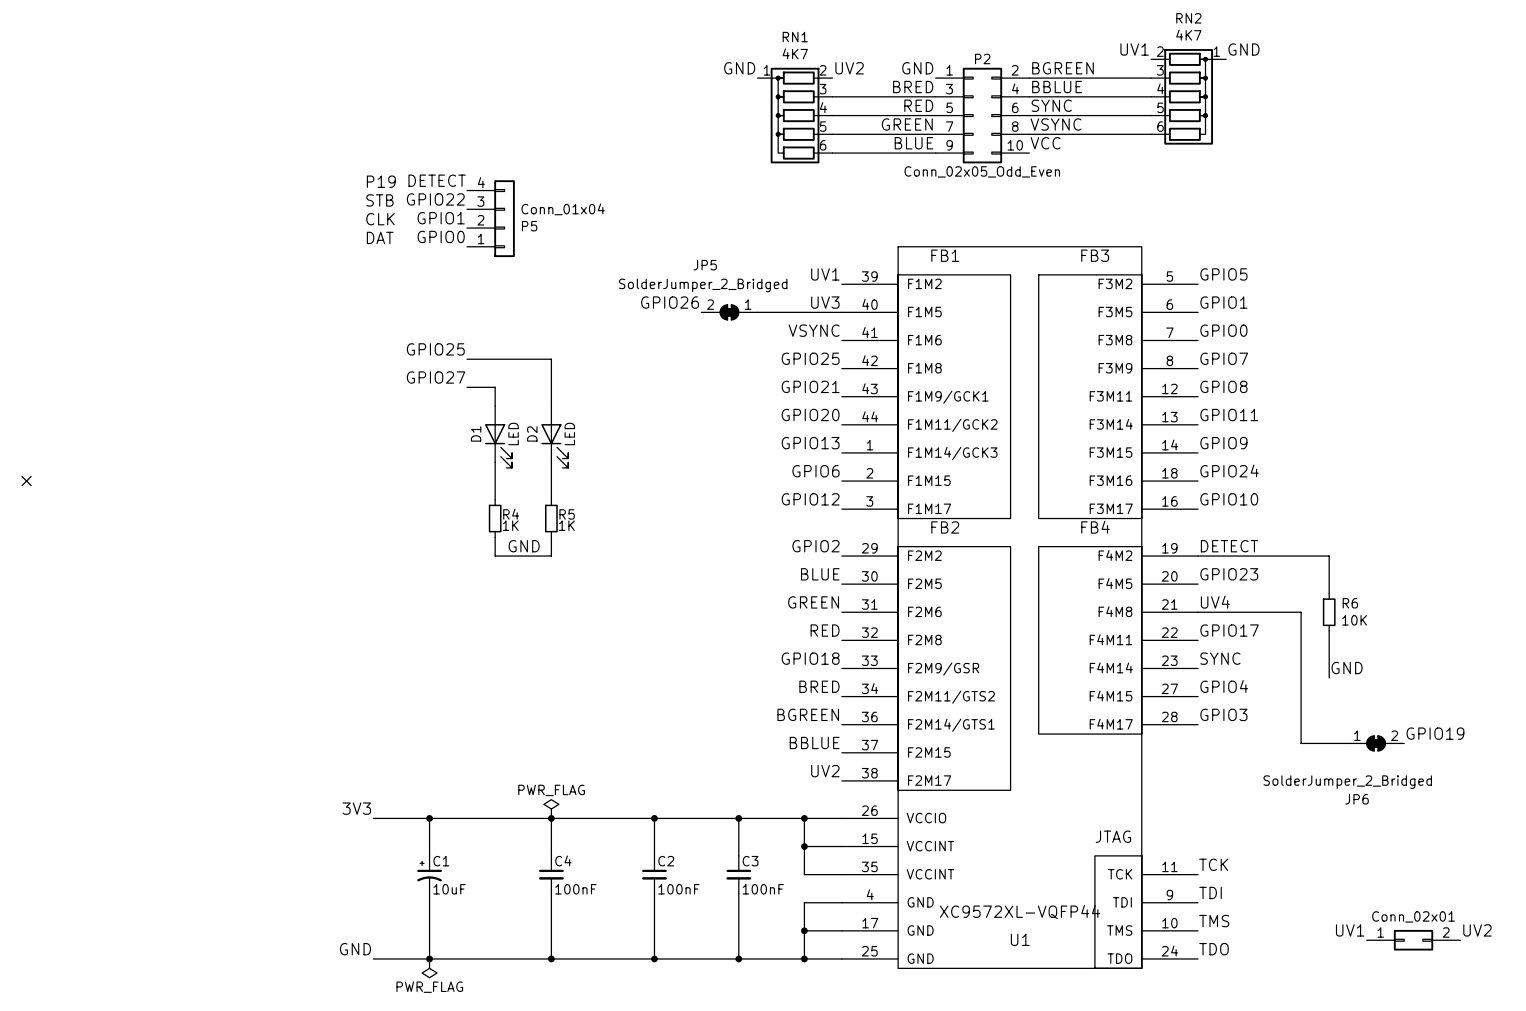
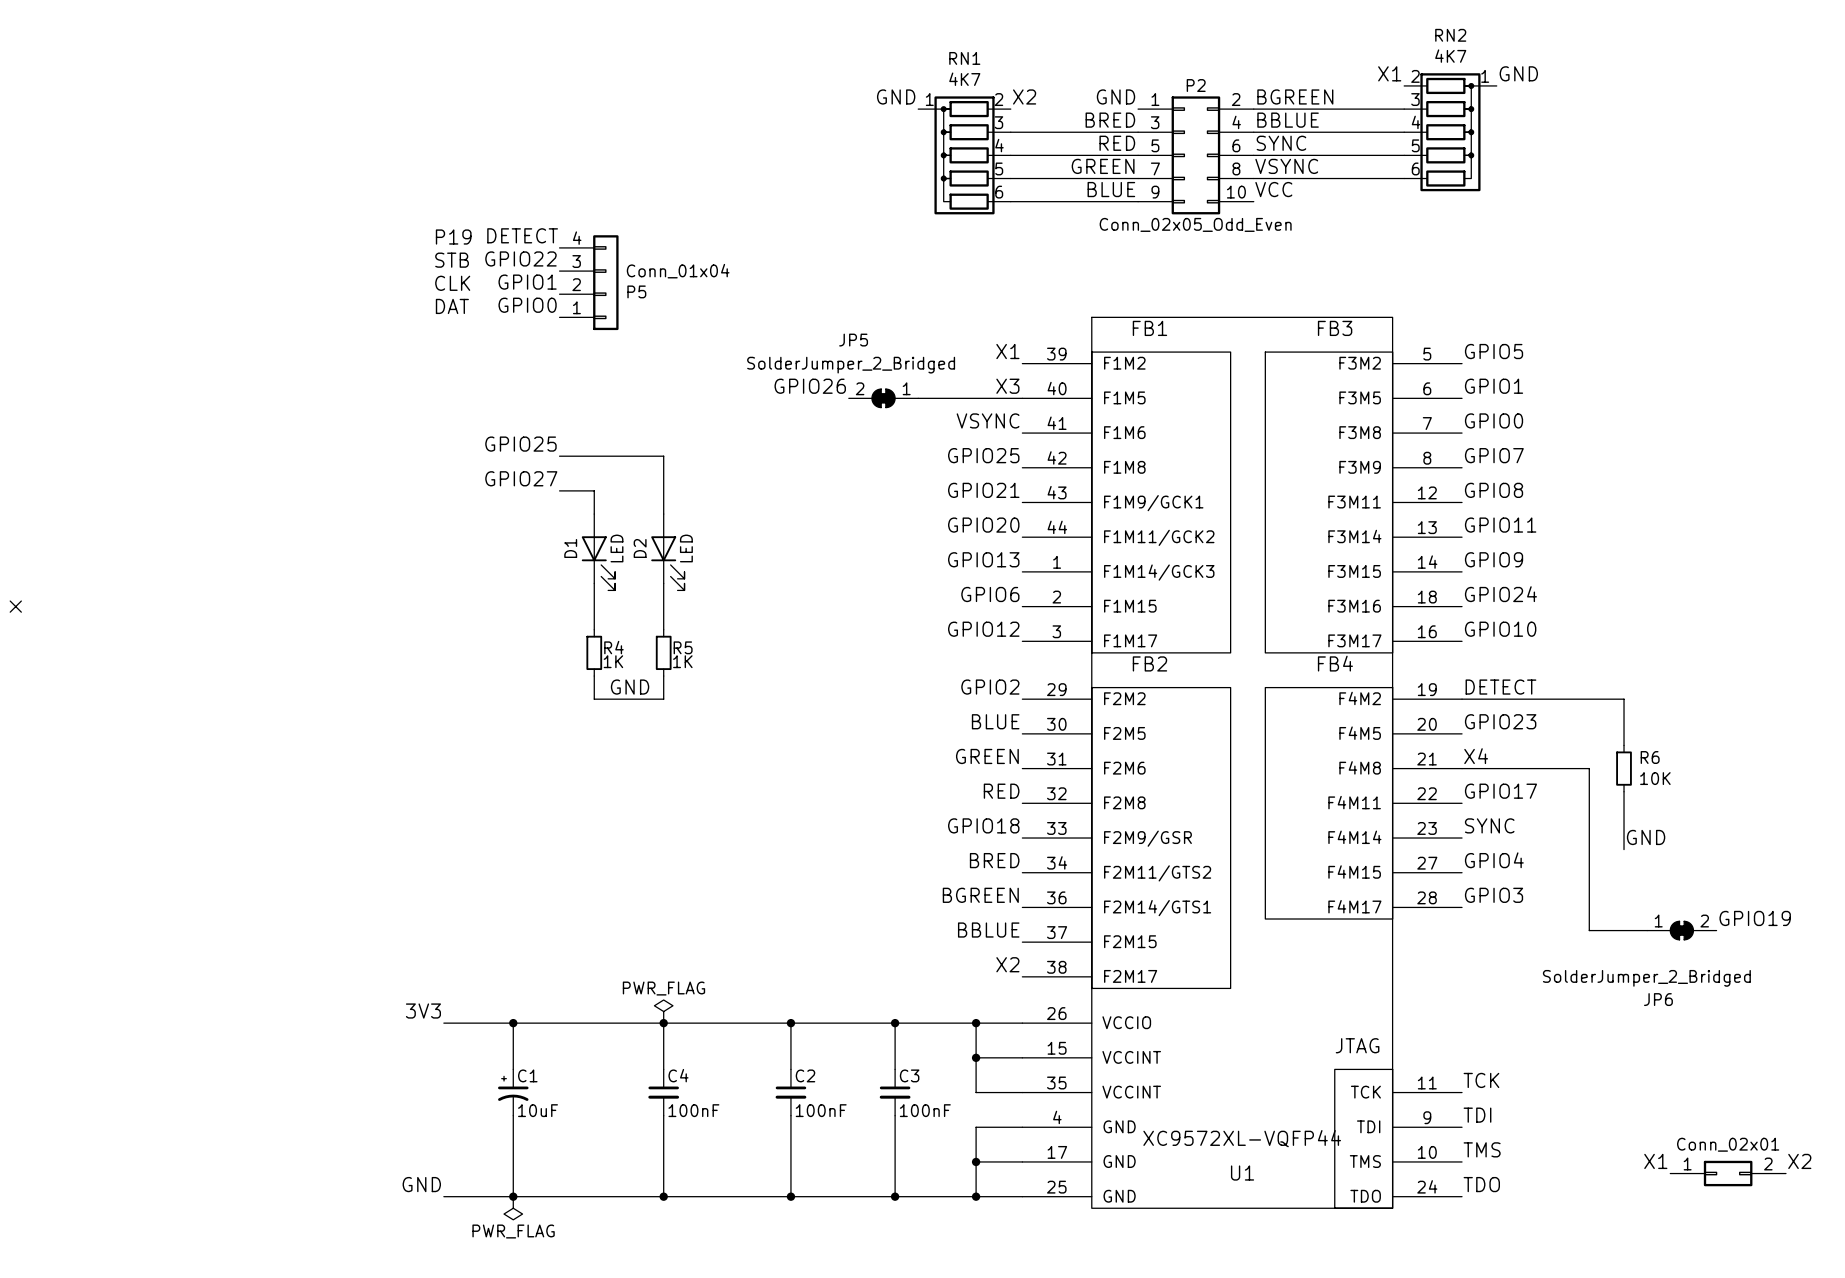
label: UV1 (1134, 49) -> X1 (1389, 73)
label: UV2 (849, 68) -> X2 (1024, 96)
label: UV1 (825, 274) -> X1 (1007, 351)
label: UV3 (825, 302) -> X3 (1007, 386)
label: UV4 (1215, 602) -> X4 (1476, 756)
label: UV2 (825, 771) -> X2 (1007, 964)
label: UV1 (1350, 930) -> X1 (1655, 1161)
label: UV2 (1477, 930) -> X2 (1799, 1161)

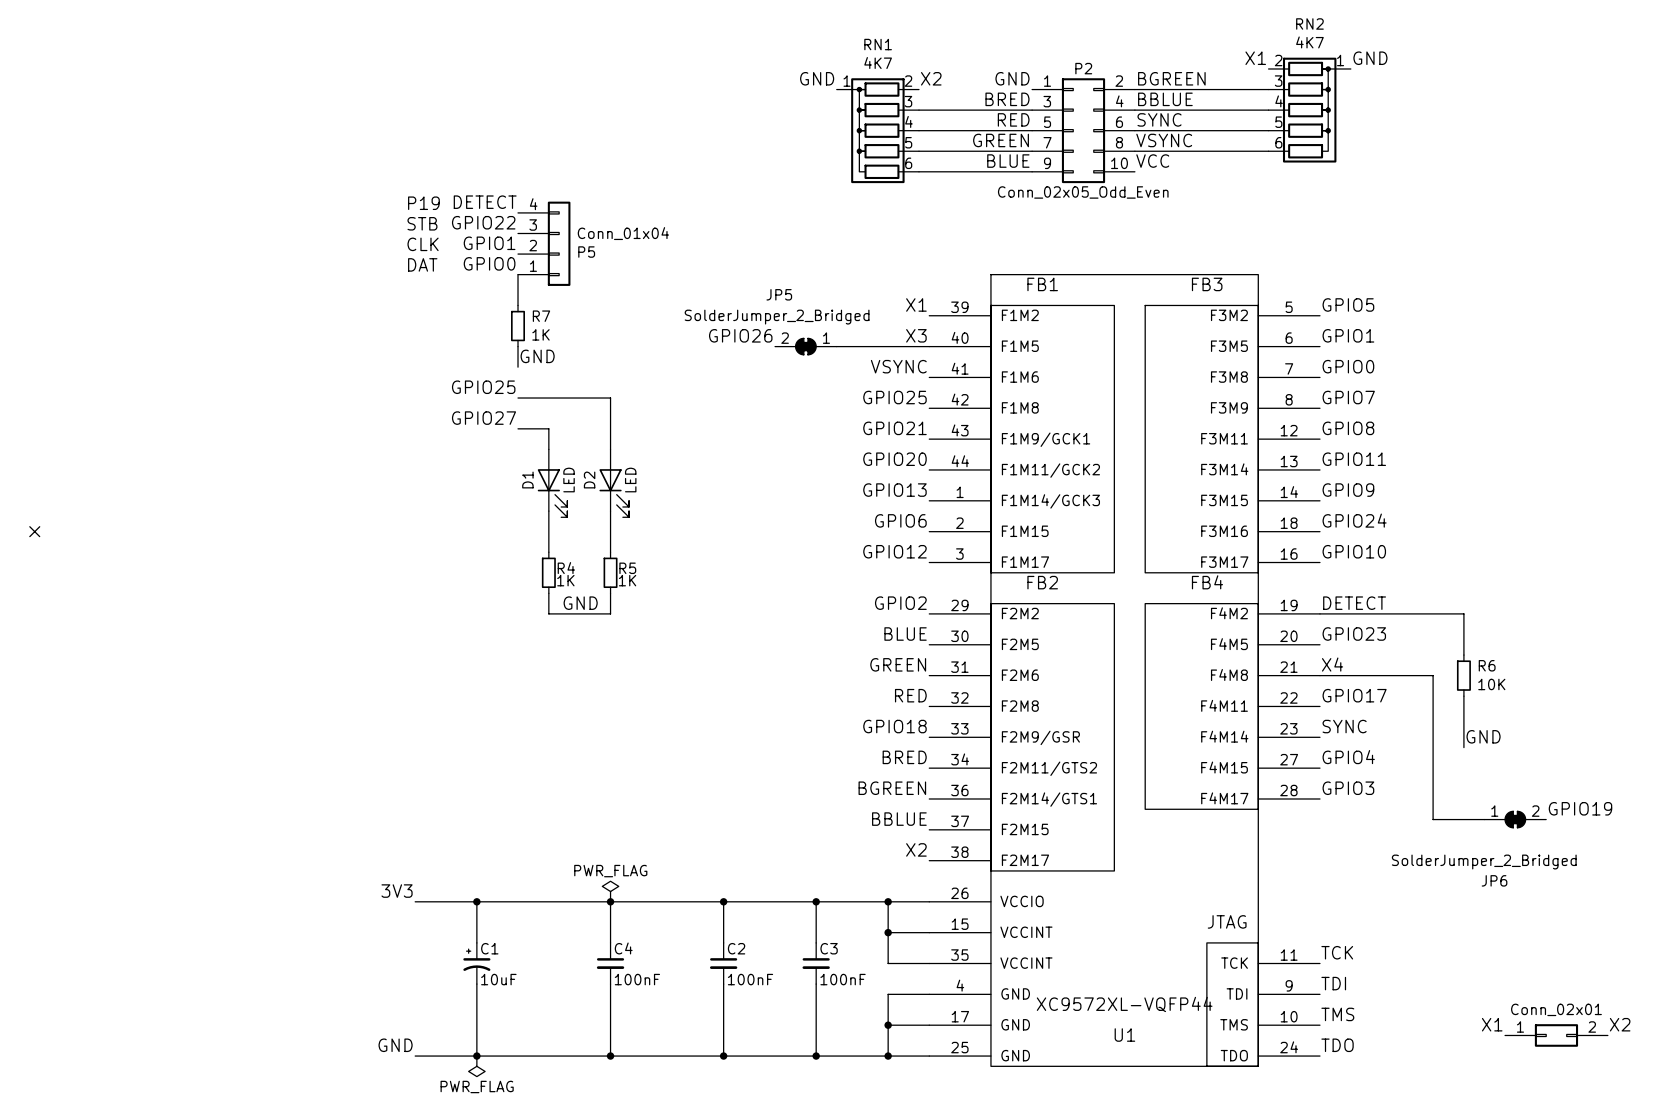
wire: none -> (518, 274) (518, 305)
R7: none -> 1K (518, 326)
wire: none -> (518, 346) (518, 367)
label: none -> GND (537, 356)

